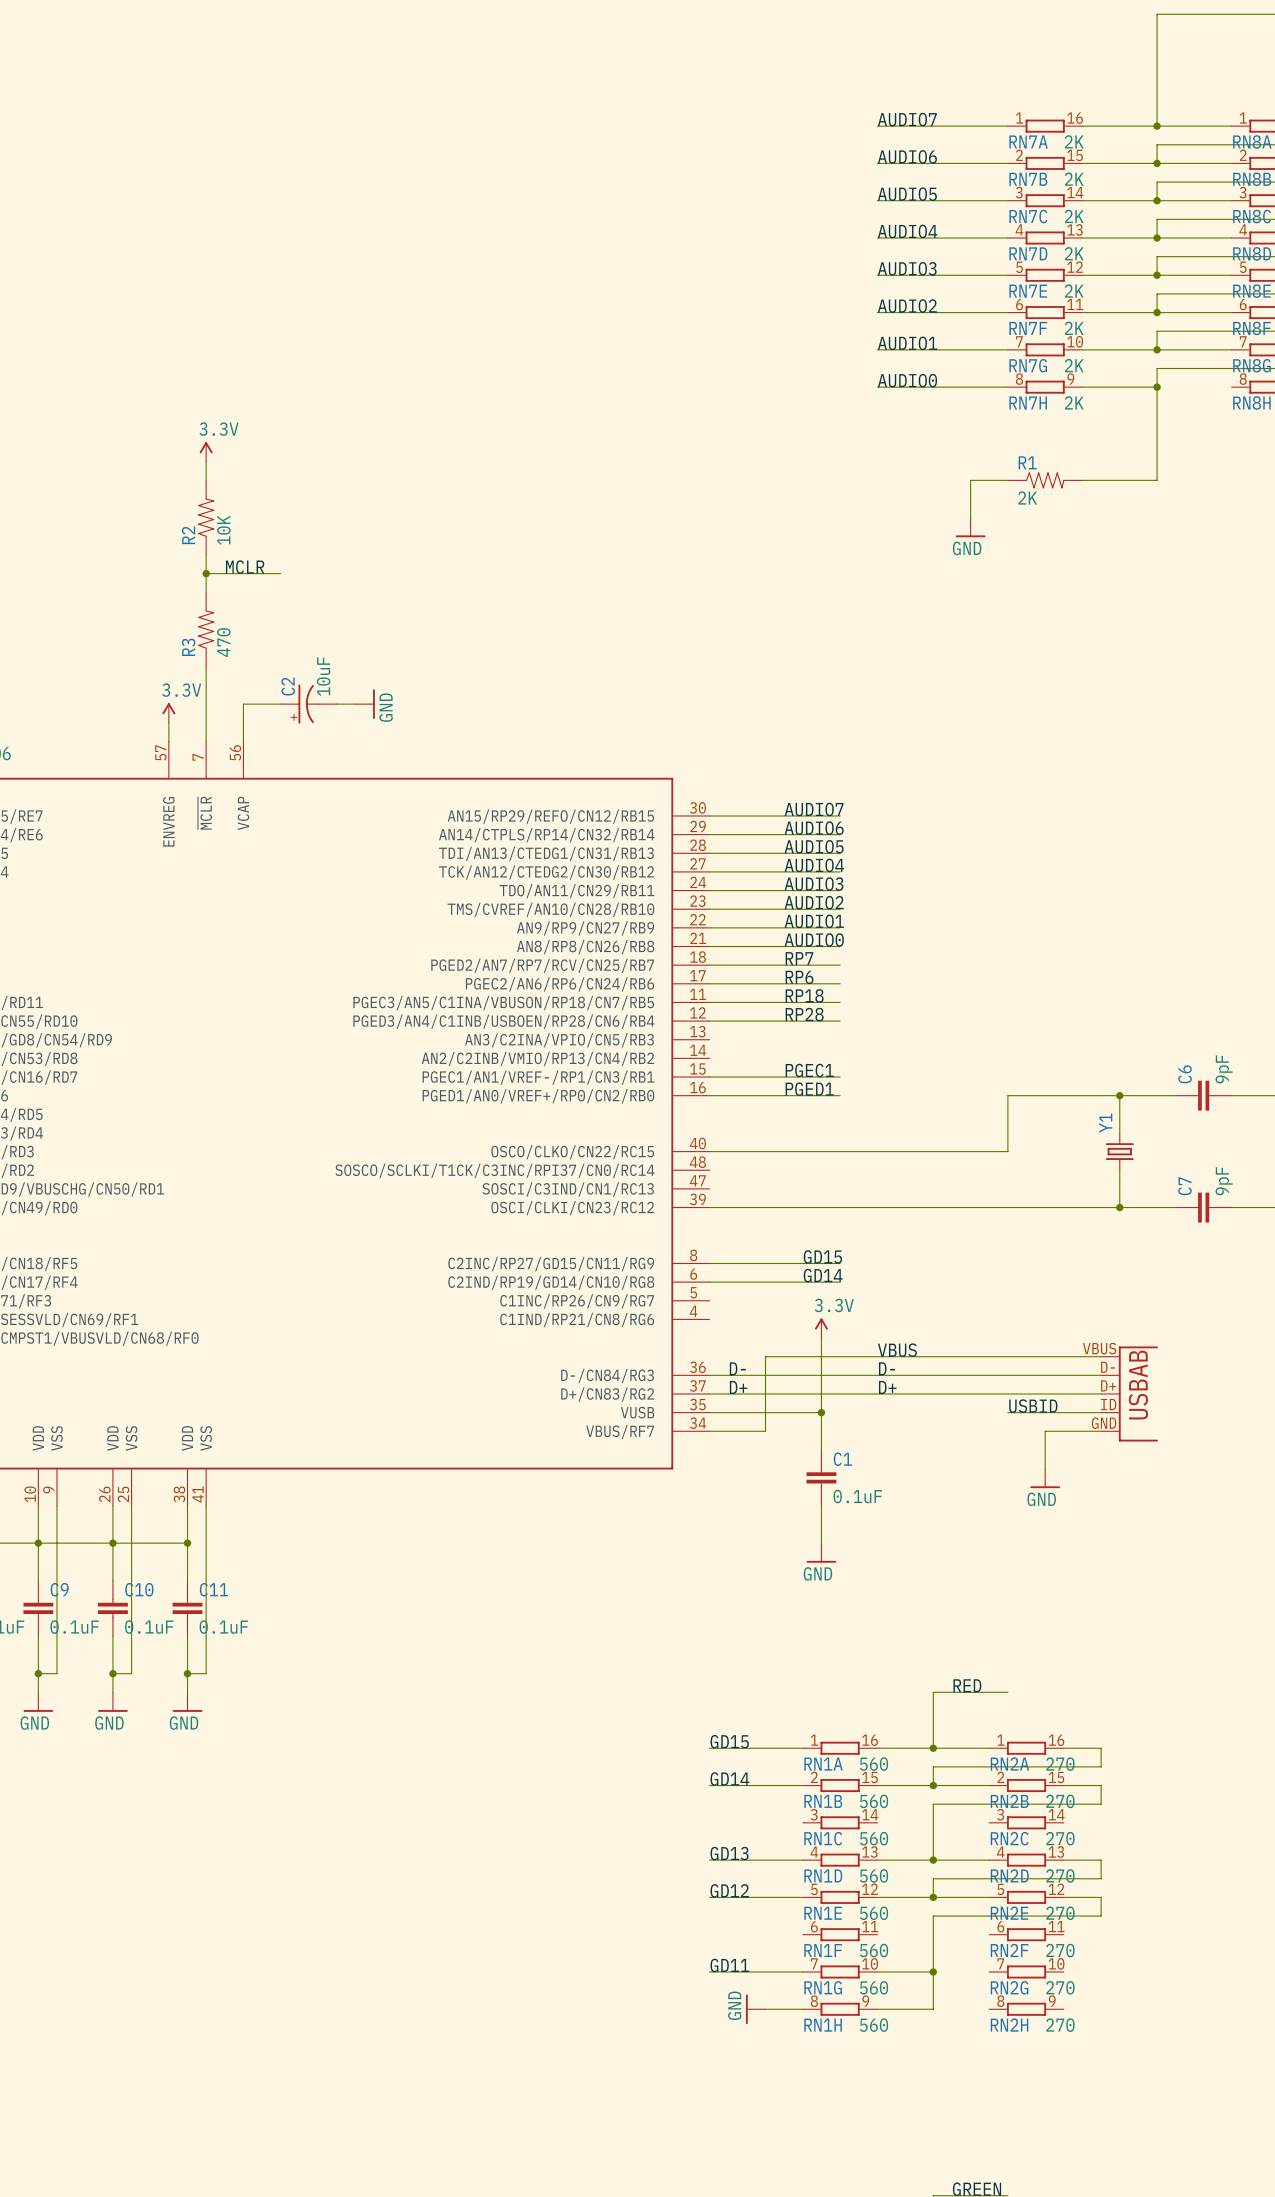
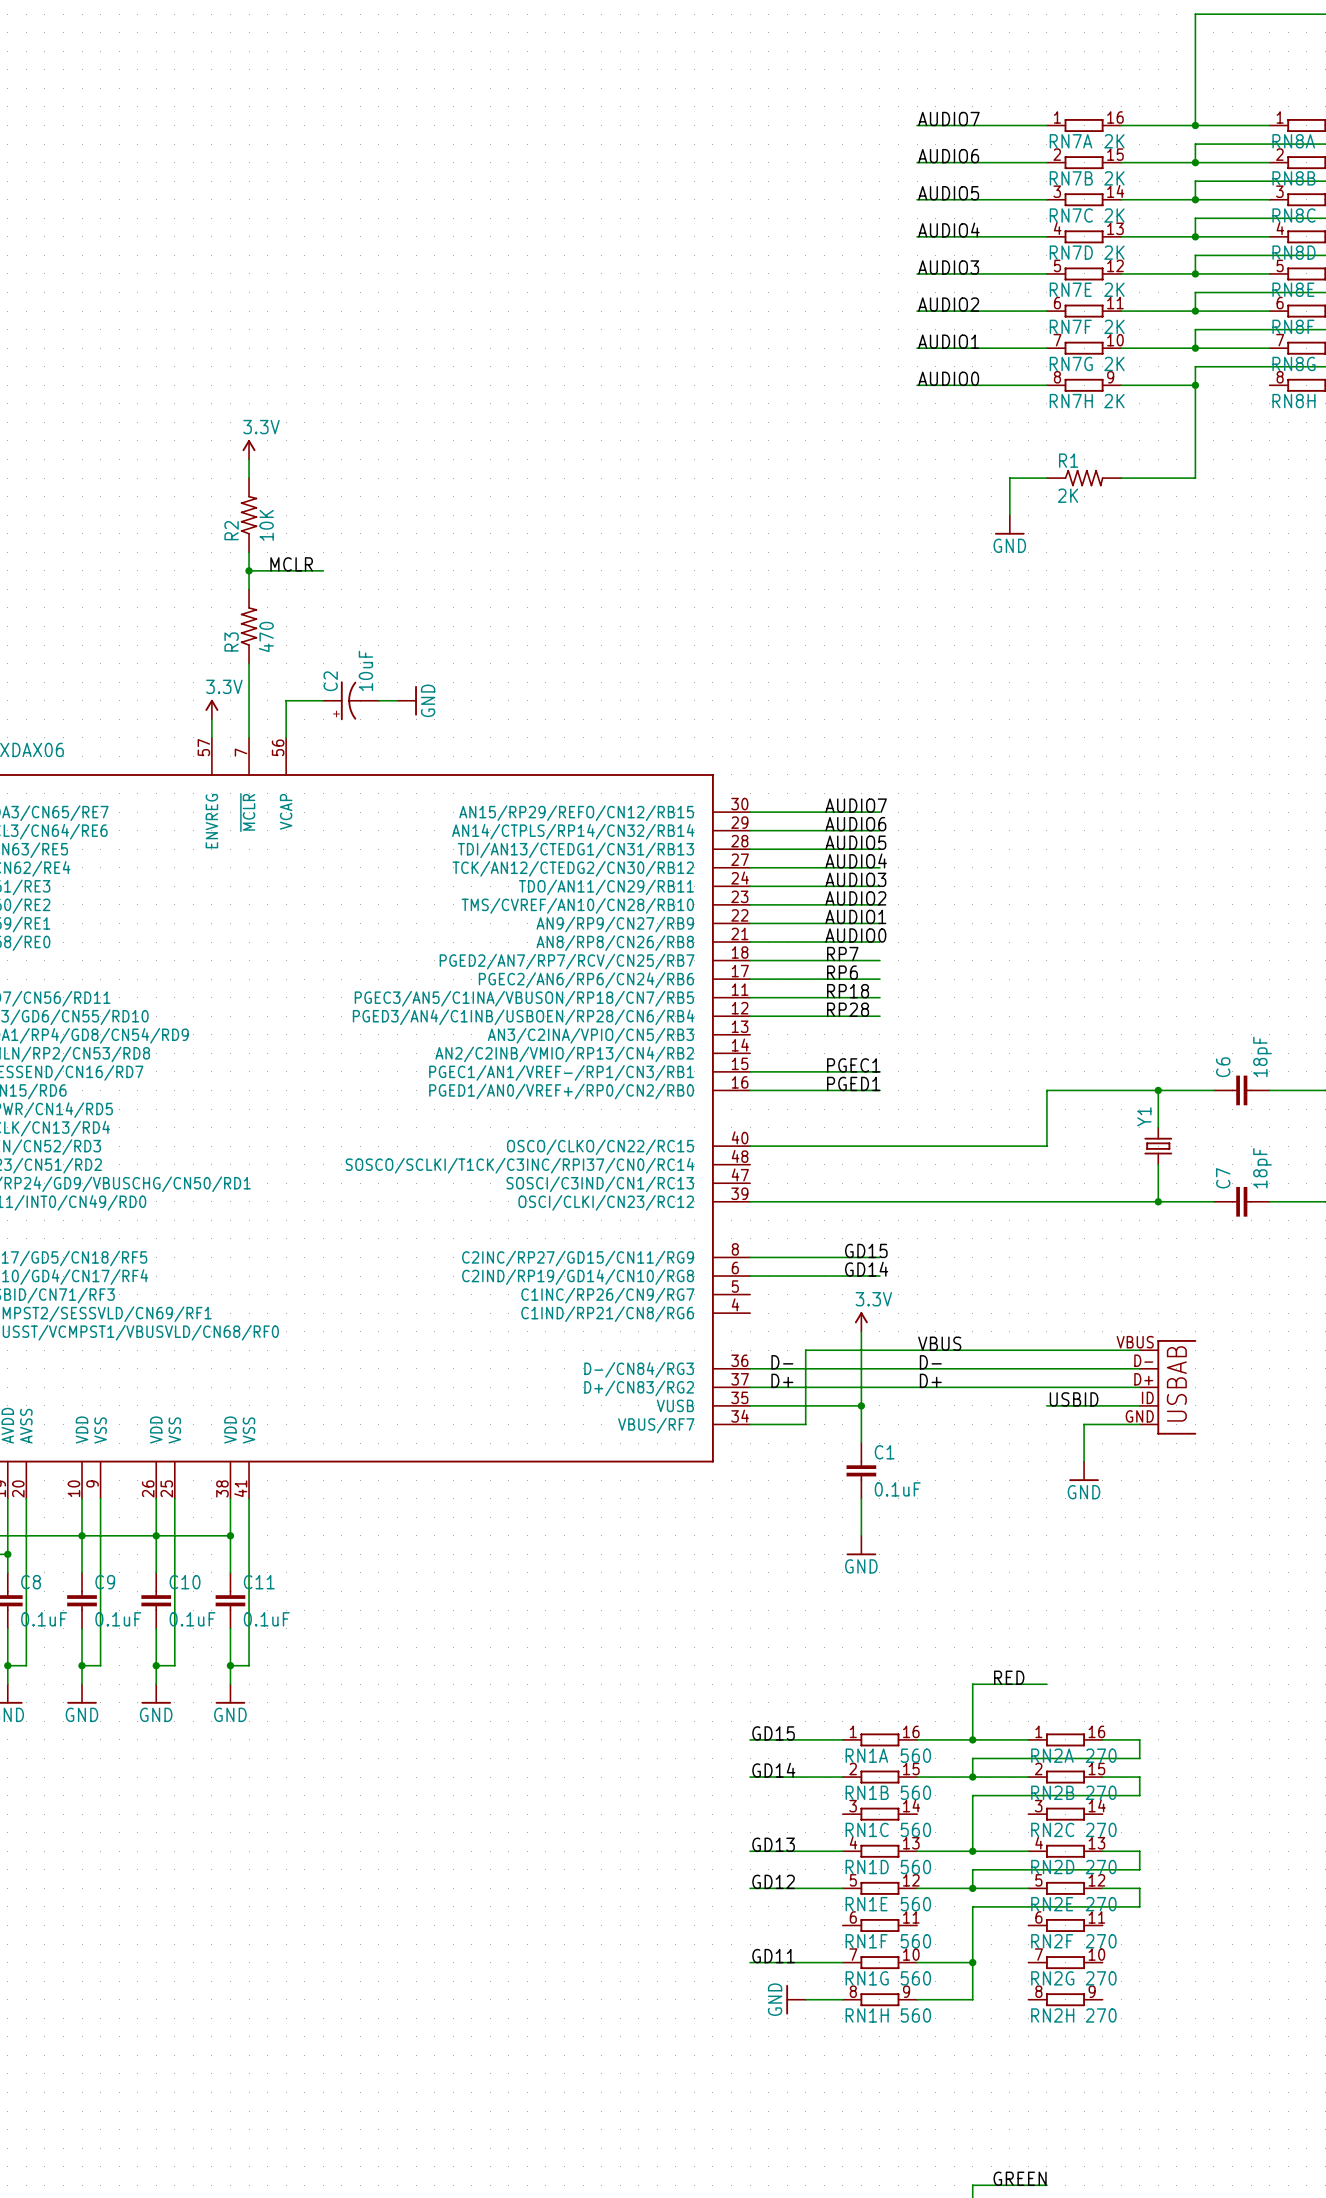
C6 value: 9pF (1224, 1069) -> 18pF (1262, 1056)
C7 value: 9pF (1224, 1181) -> 18pF (1262, 1168)

